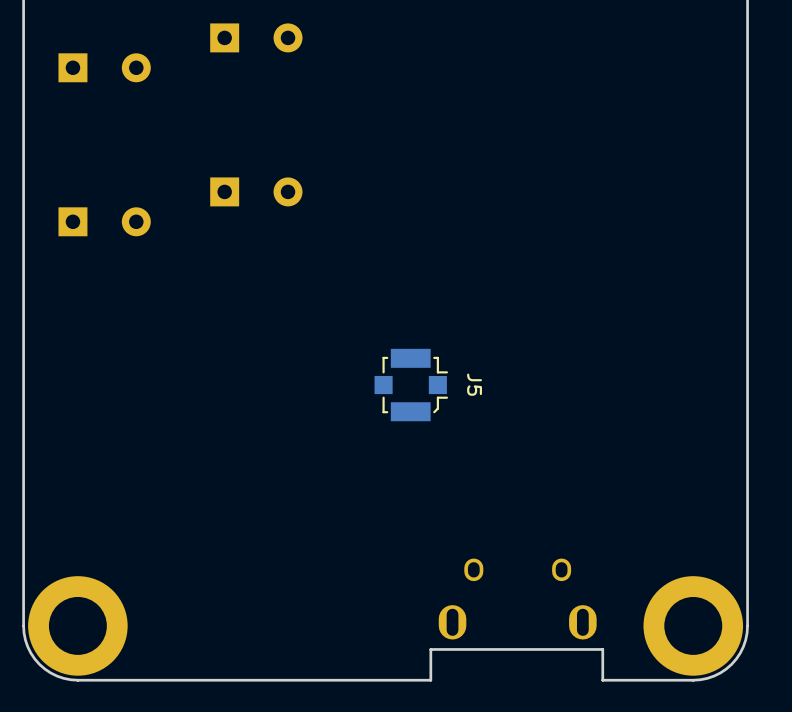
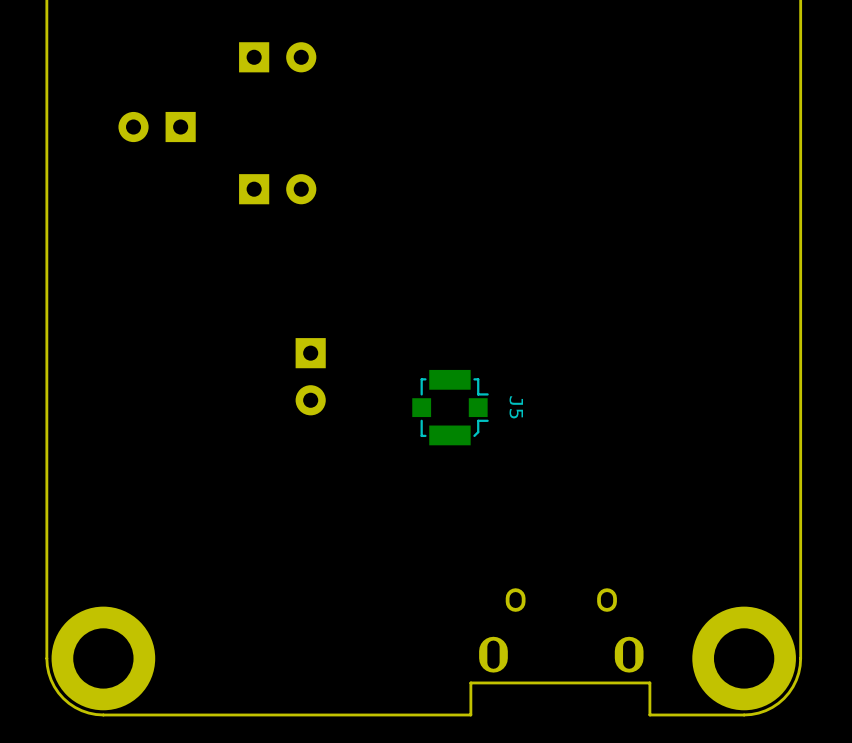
part footprint: [210, 23, 303, 53] -> [239, 42, 317, 73]
part: (104, 67) -> none
part: none -> (157, 127)
part: none -> (277, 189)
part: (256, 191) -> none
part: (104, 221) -> none
part: none -> (310, 376)

